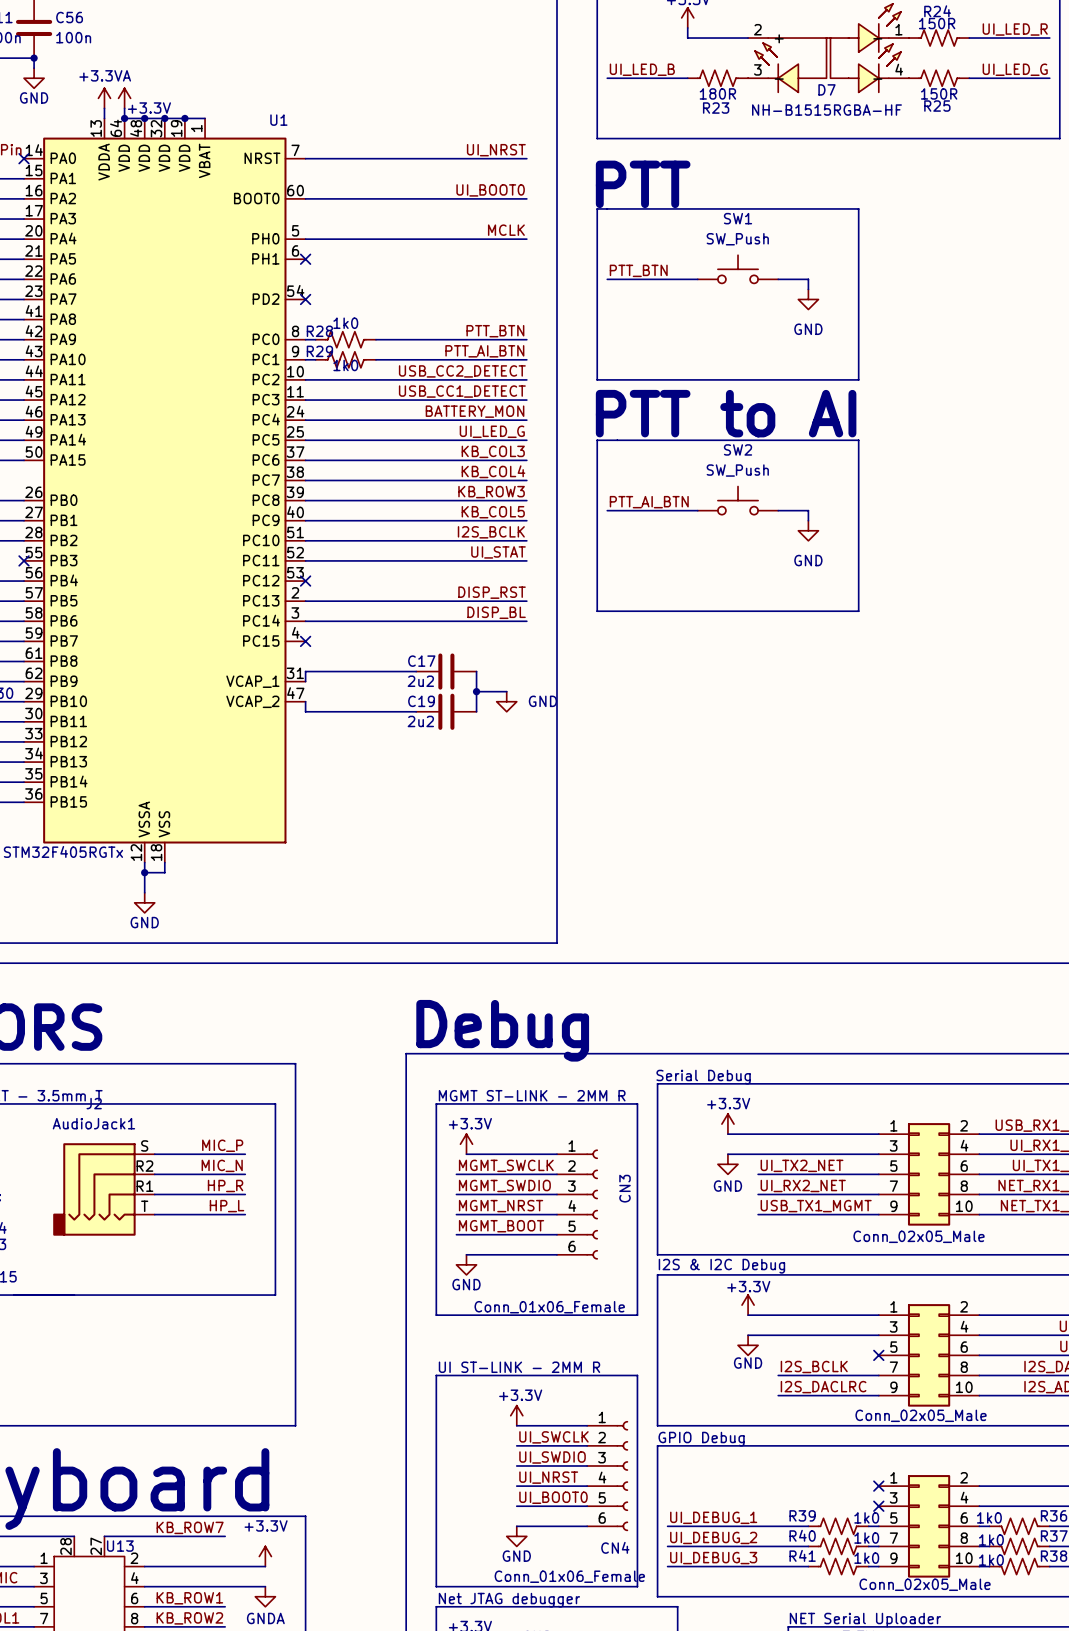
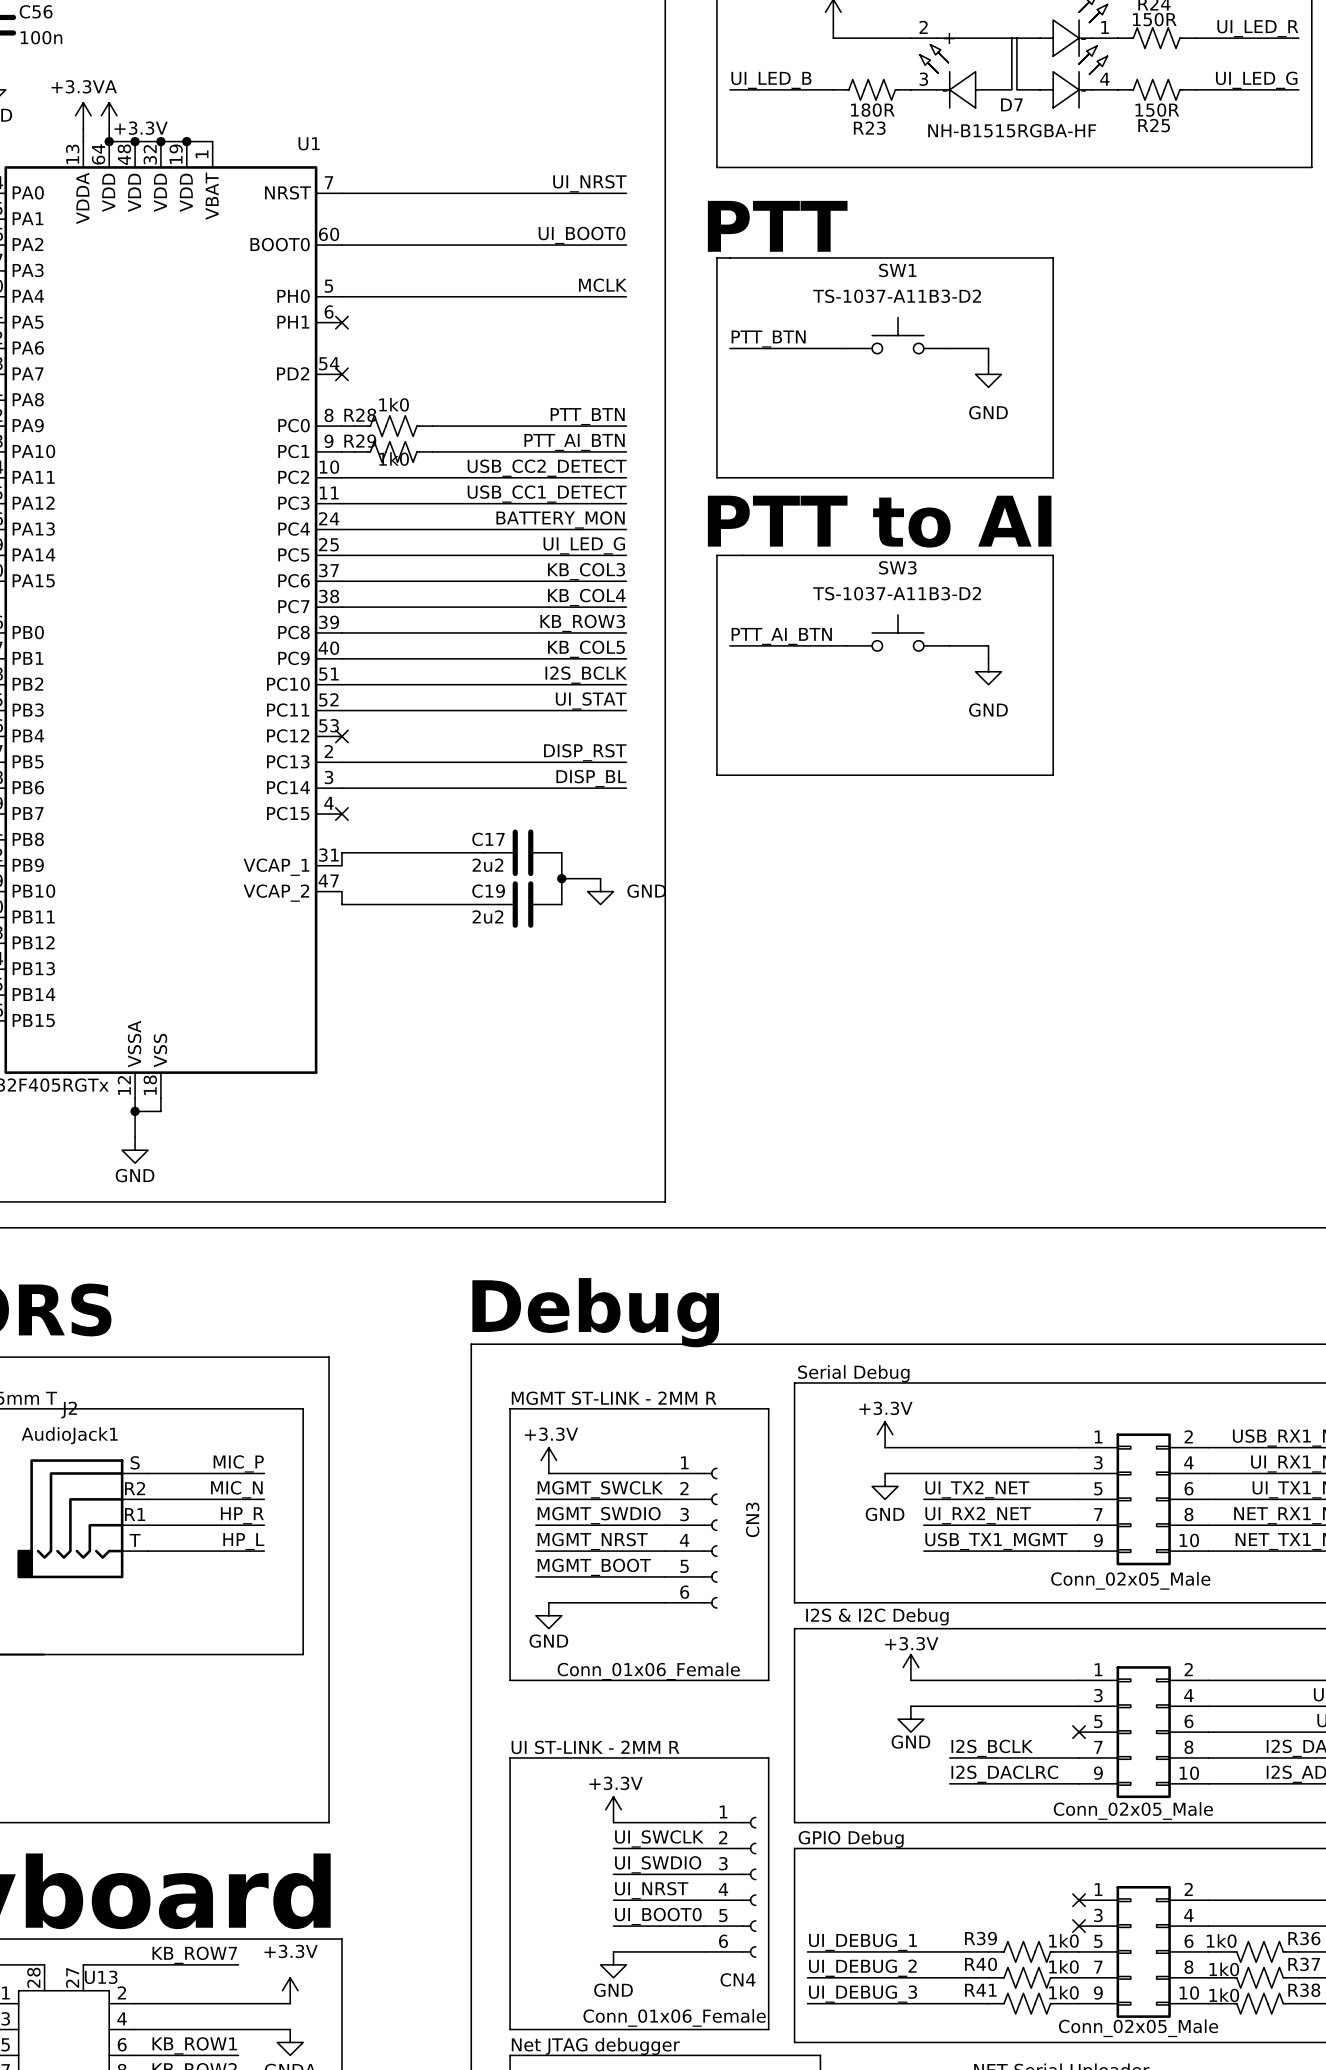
SW1 value: SW_Push (737, 239) -> TS-1037-A11B3-D2 (897, 296)
SW2 name: SW2 (738, 449) -> SW3 (897, 567)
SW2 value: SW_Push (737, 470) -> TS-1037-A11B3-D2 (897, 593)

